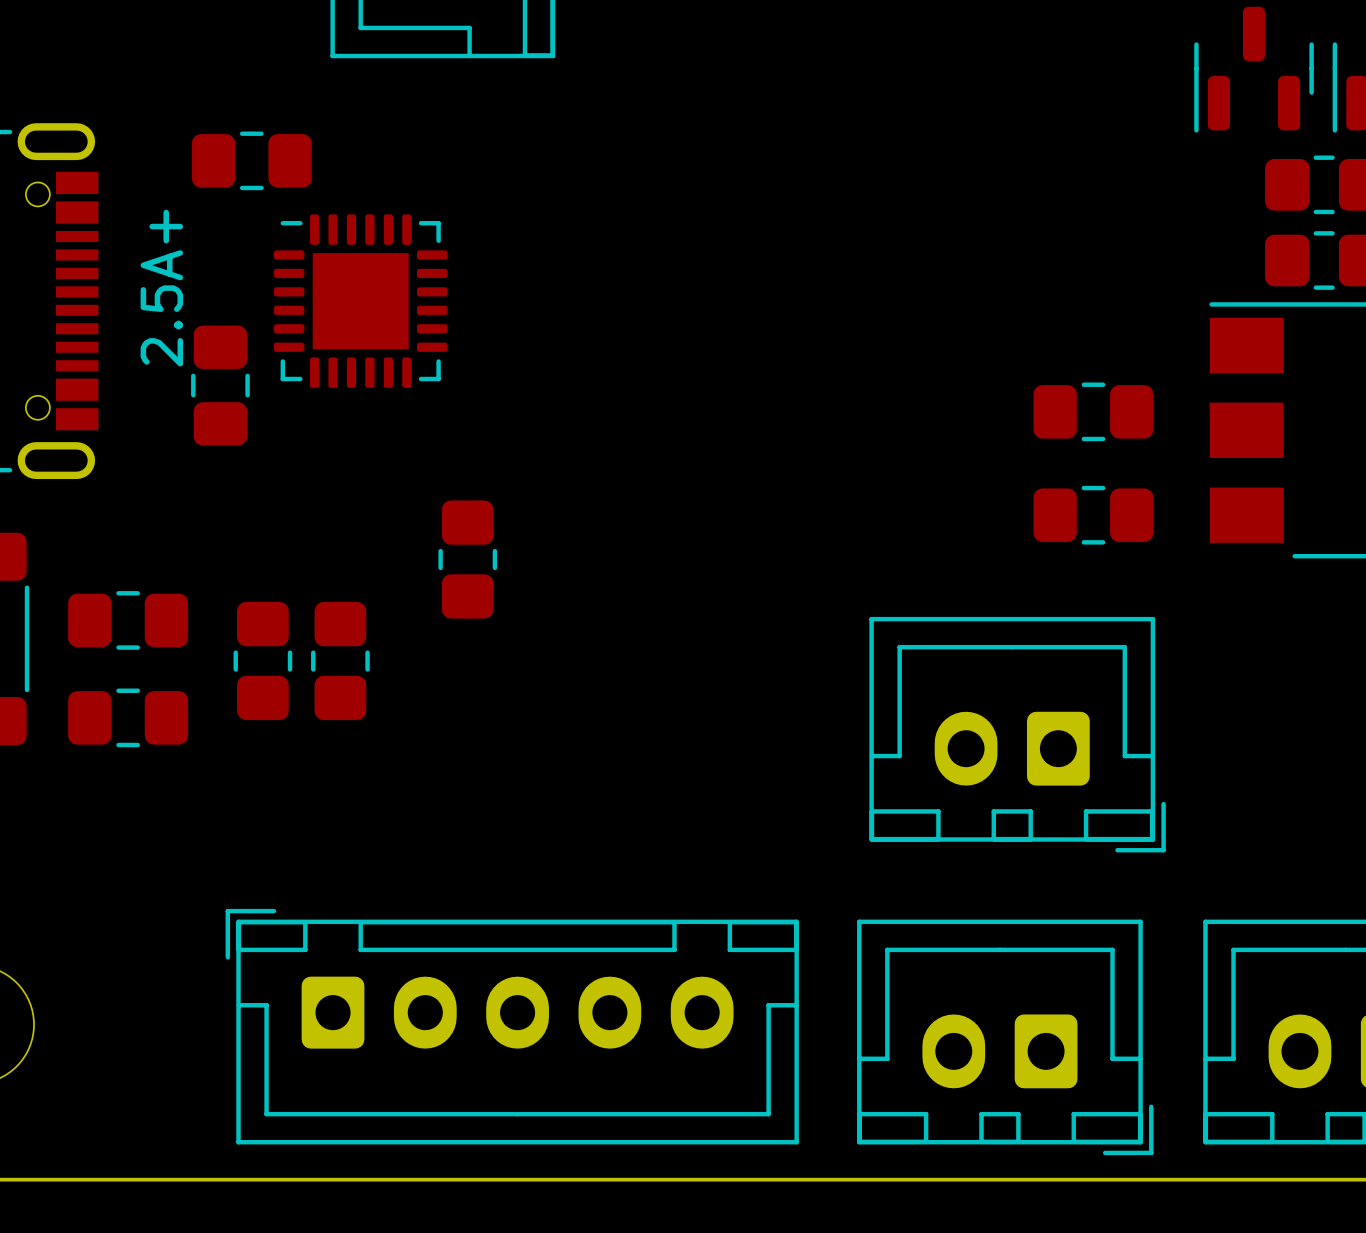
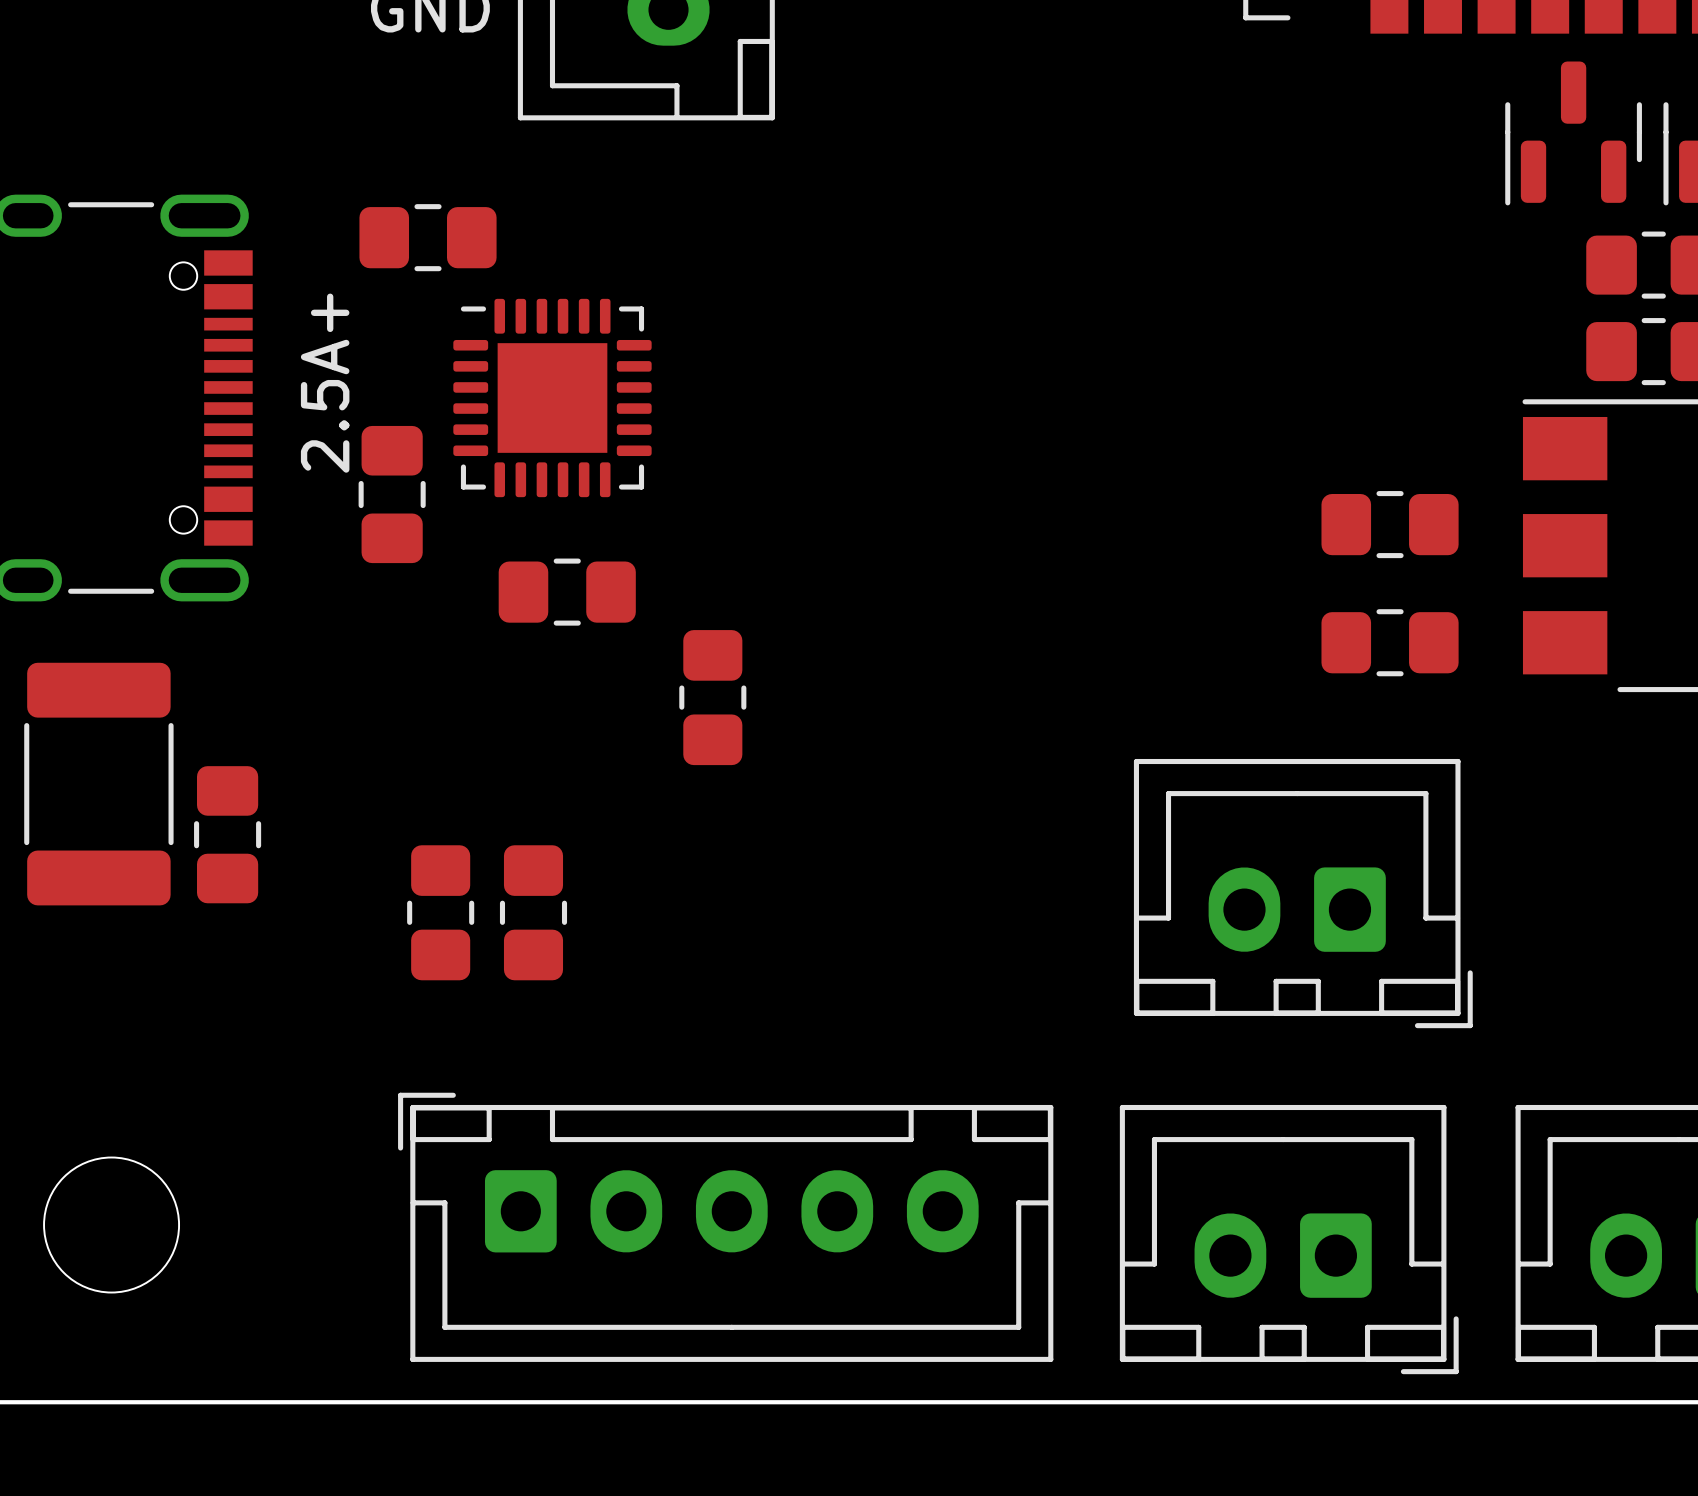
part: none -> (567, 592)
part position: (467, 559) -> (712, 697)
part: (128, 620) -> none
part: (262, 661) -> none
part: (340, 661) -> none
part: none -> (227, 834)
part: (128, 717) -> none
part: none -> (440, 912)
part: none -> (533, 912)

